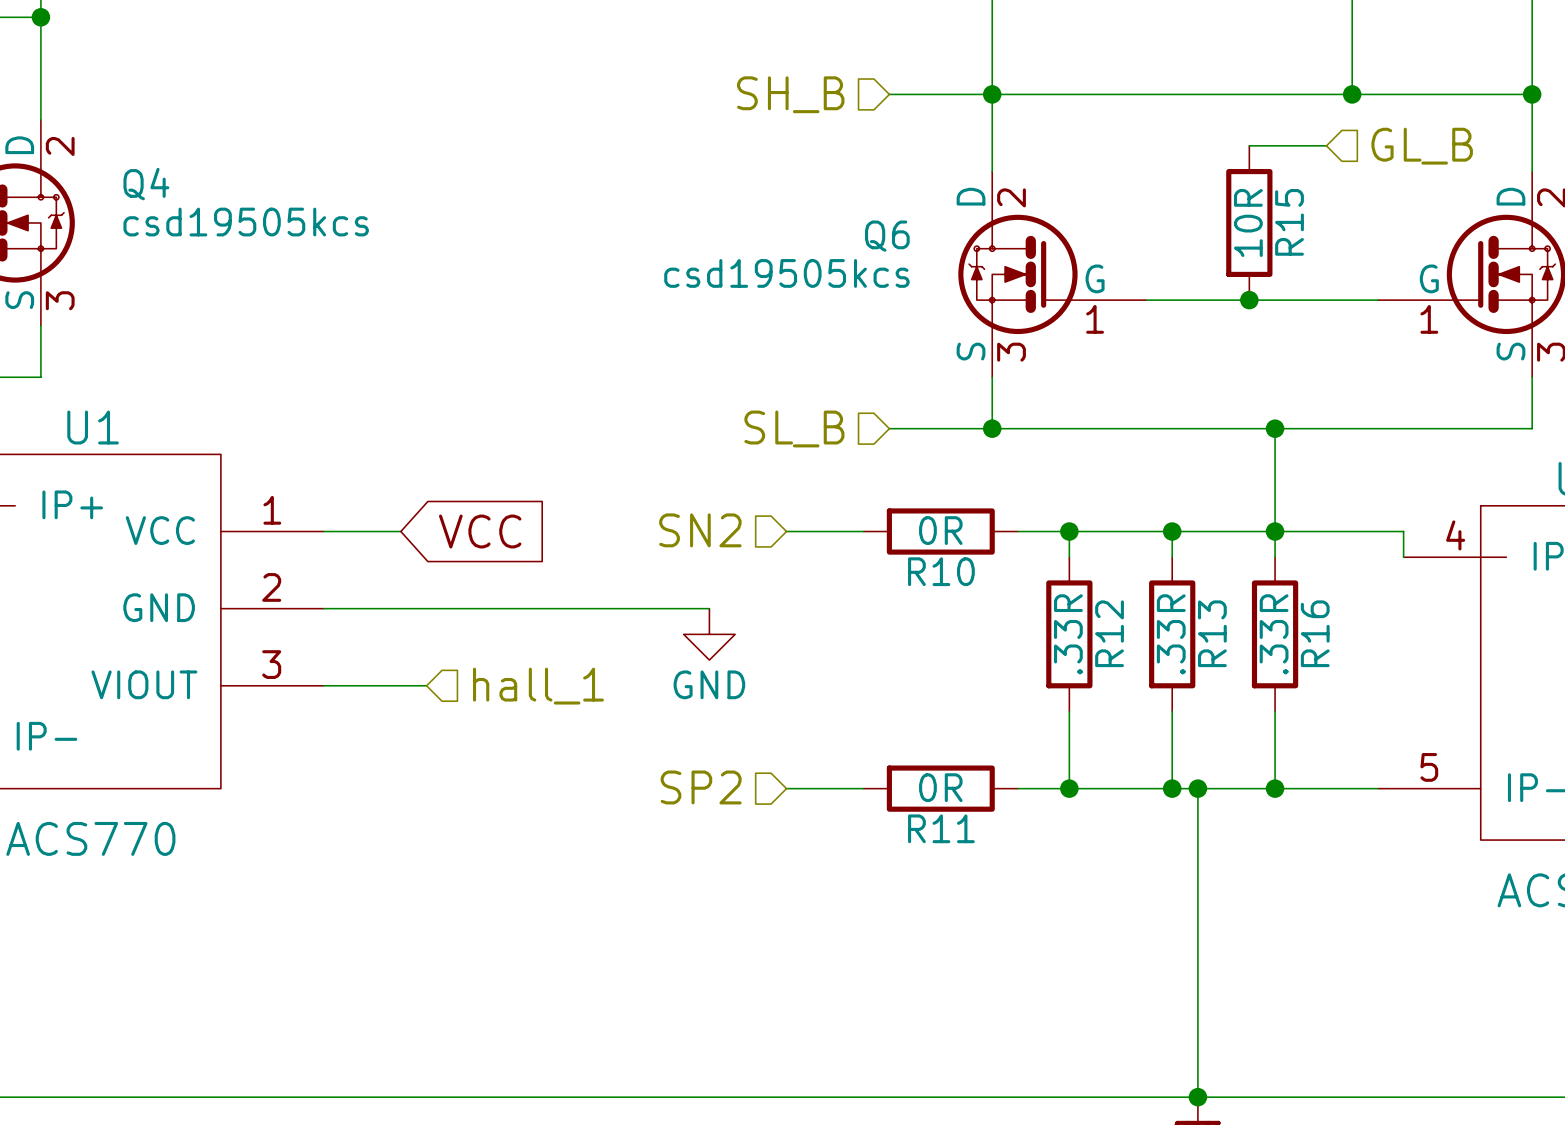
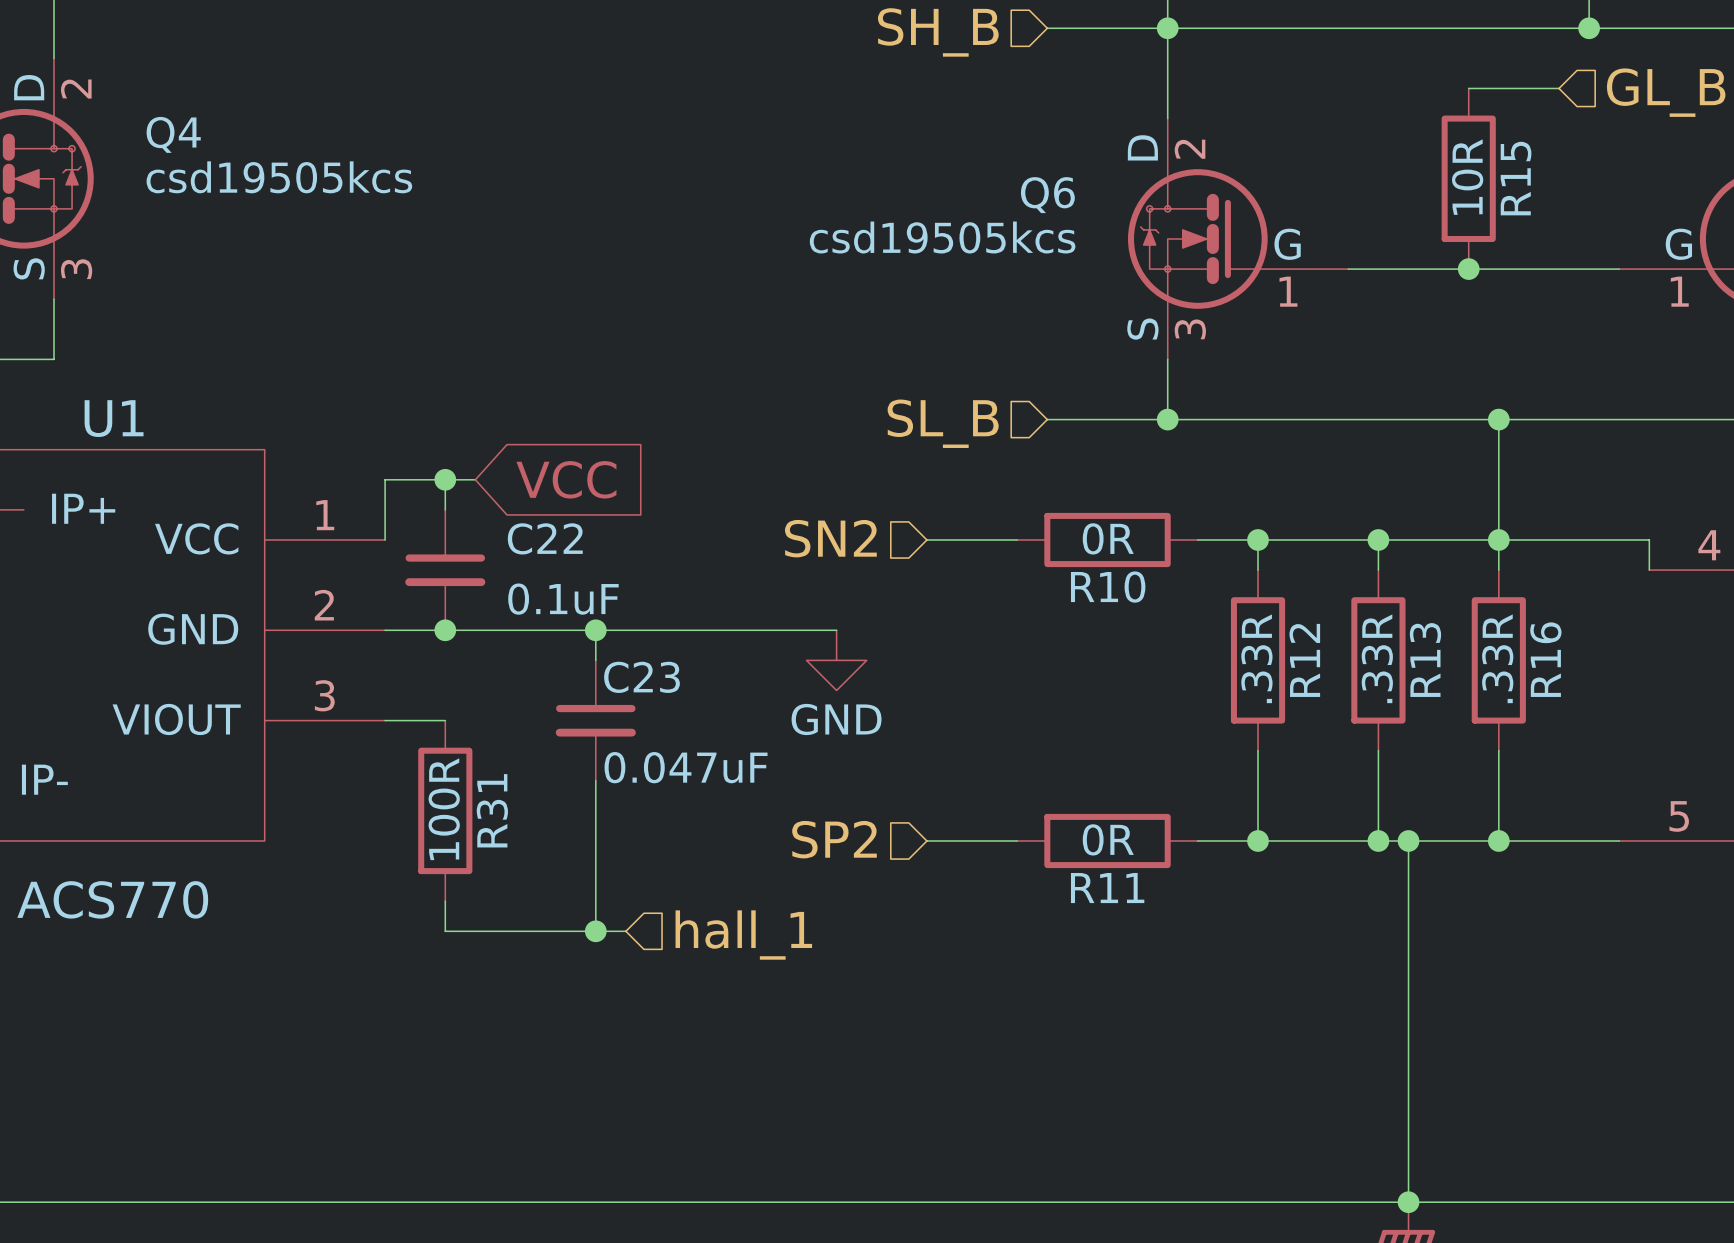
wire: none -> (445, 479) (445, 509)
junction: none -> (445, 479)
wire: (323, 531) (400, 531) -> (385, 539) (385, 479) (475, 479)
global label position: VCC (480, 531) -> VCC (566, 479)
C22: none -> 0.1uF (445, 570)
junction: none -> (445, 630)
wire: none -> (595, 630) (595, 660)
junction: none -> (595, 630)
wire: (375, 685) (426, 685) -> none
C23: none -> 0.047uF (595, 720)
hierarchical label position: hall_1 (538, 686) -> hall_1 (743, 935)
wire: none -> (595, 780) (595, 931)
R31: none -> 100R (445, 810)
wire: none -> (445, 901) (445, 931) (625, 931)
junction: none -> (595, 931)

